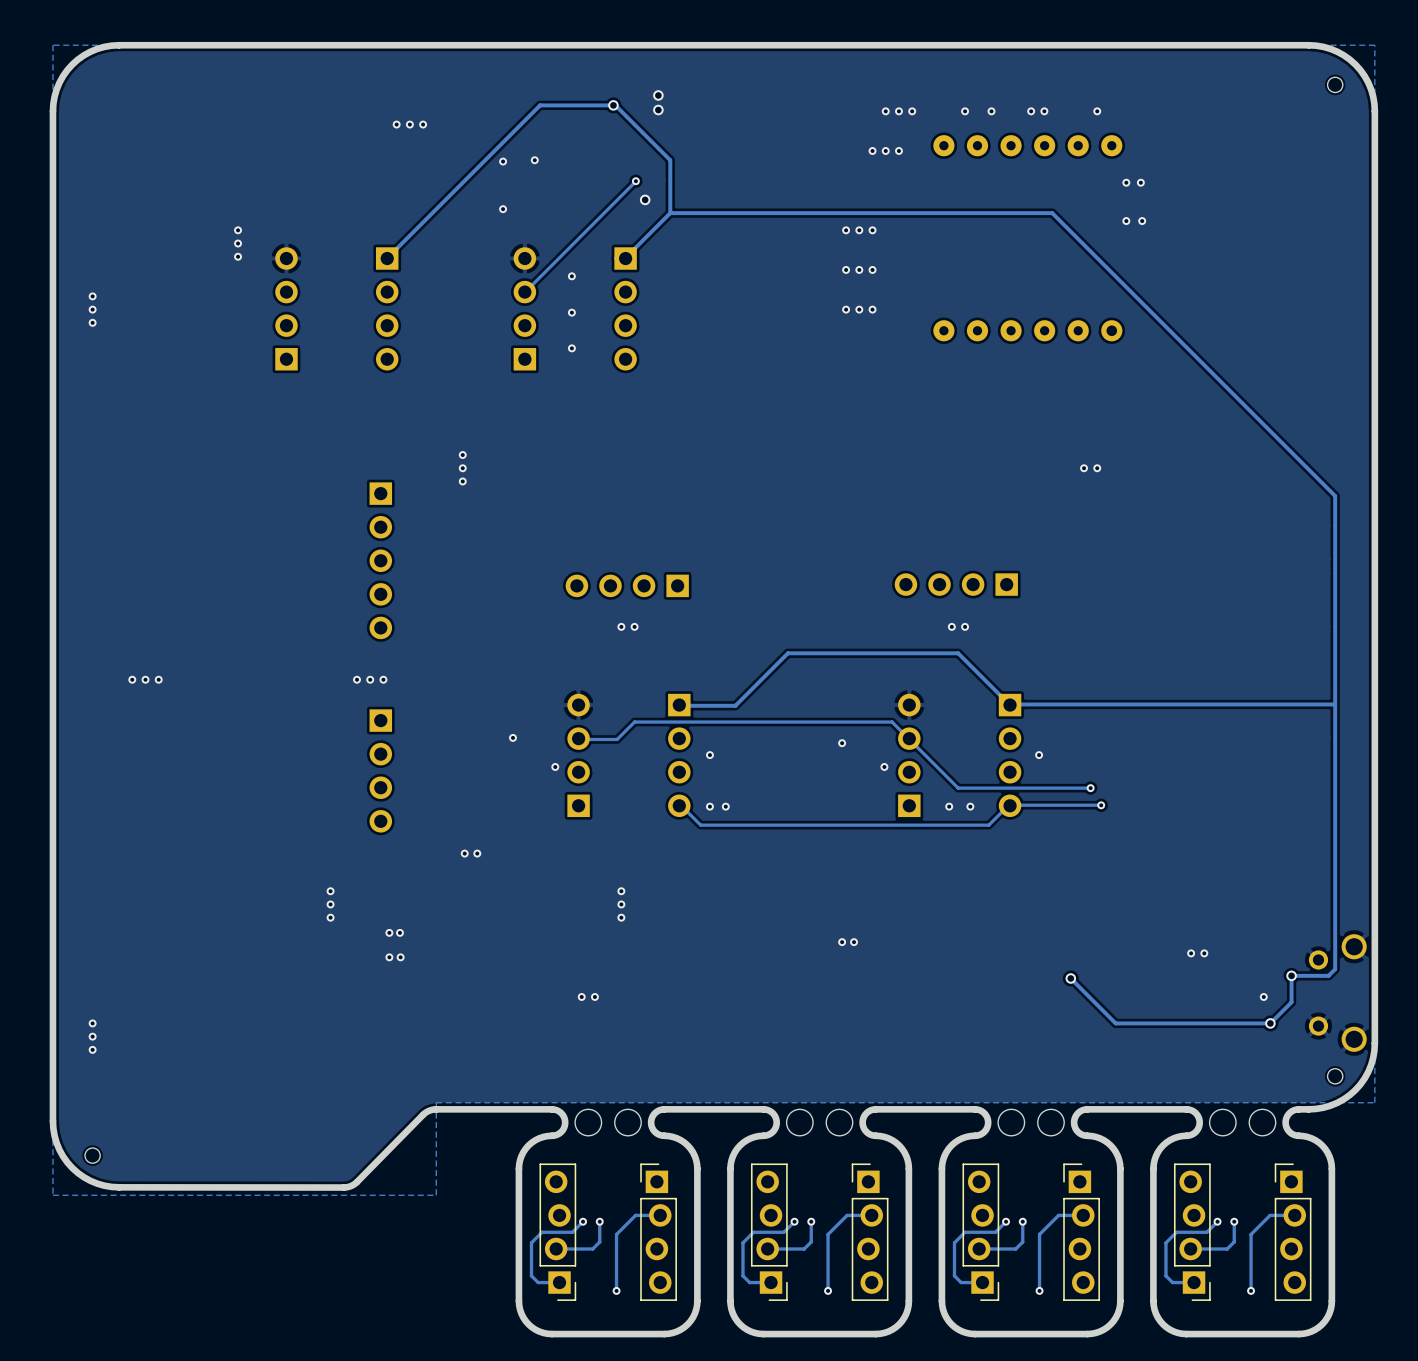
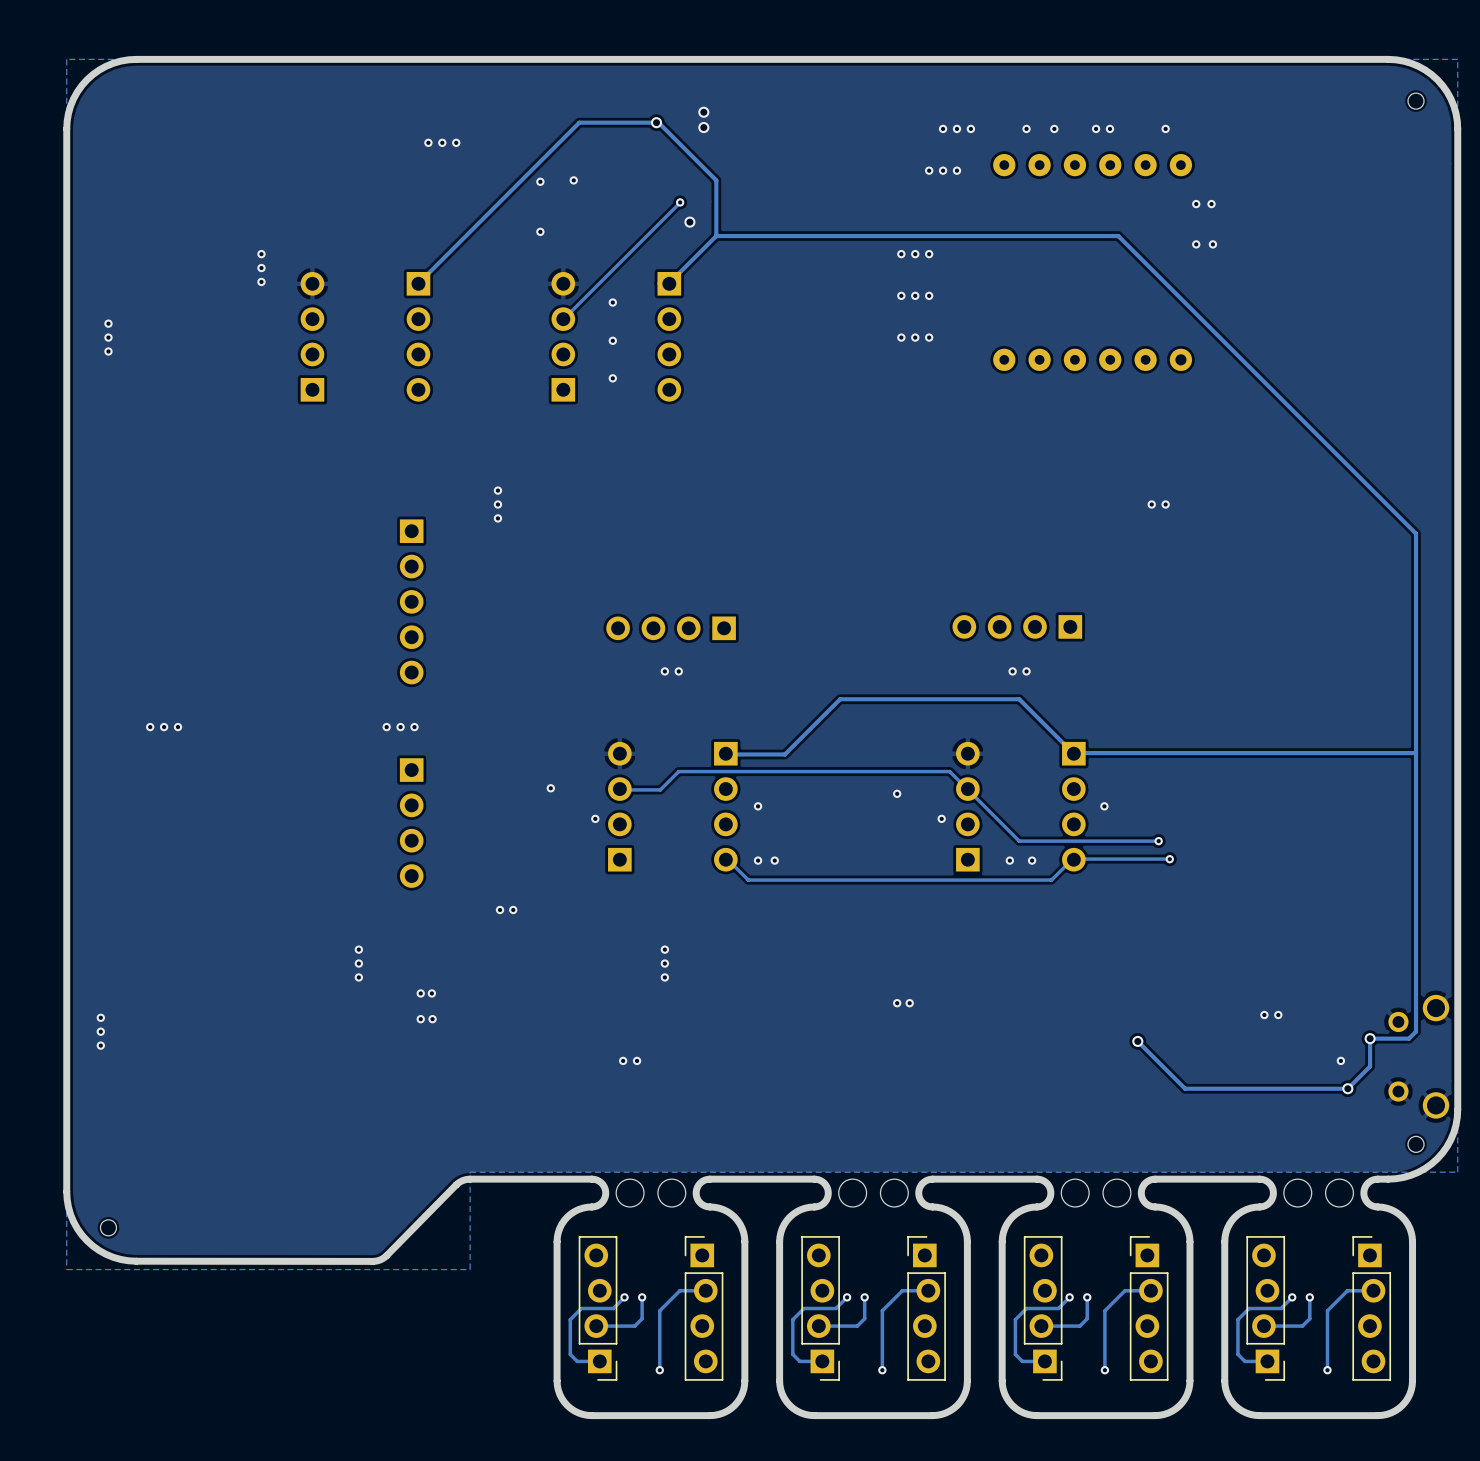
via: none -> (100, 1017)
via: none -> (100, 1031)
via: none -> (100, 1045)
via: (92, 1023) -> none
via: (92, 1036) -> none
via: (92, 1049) -> none

